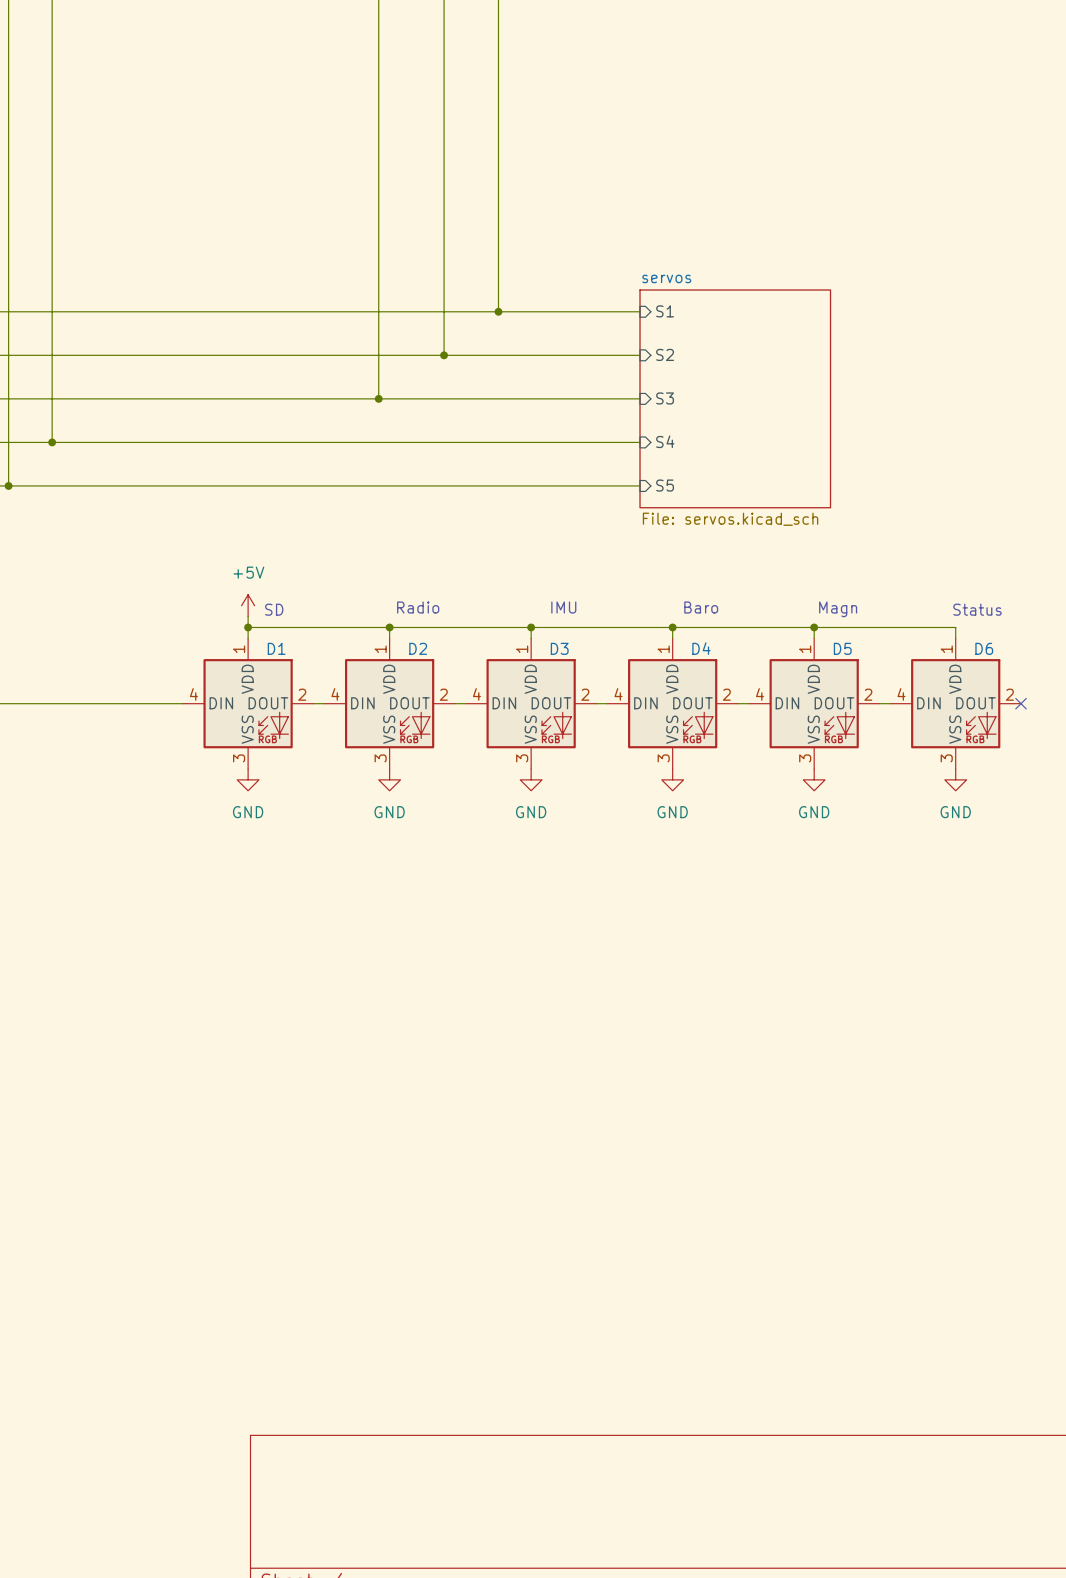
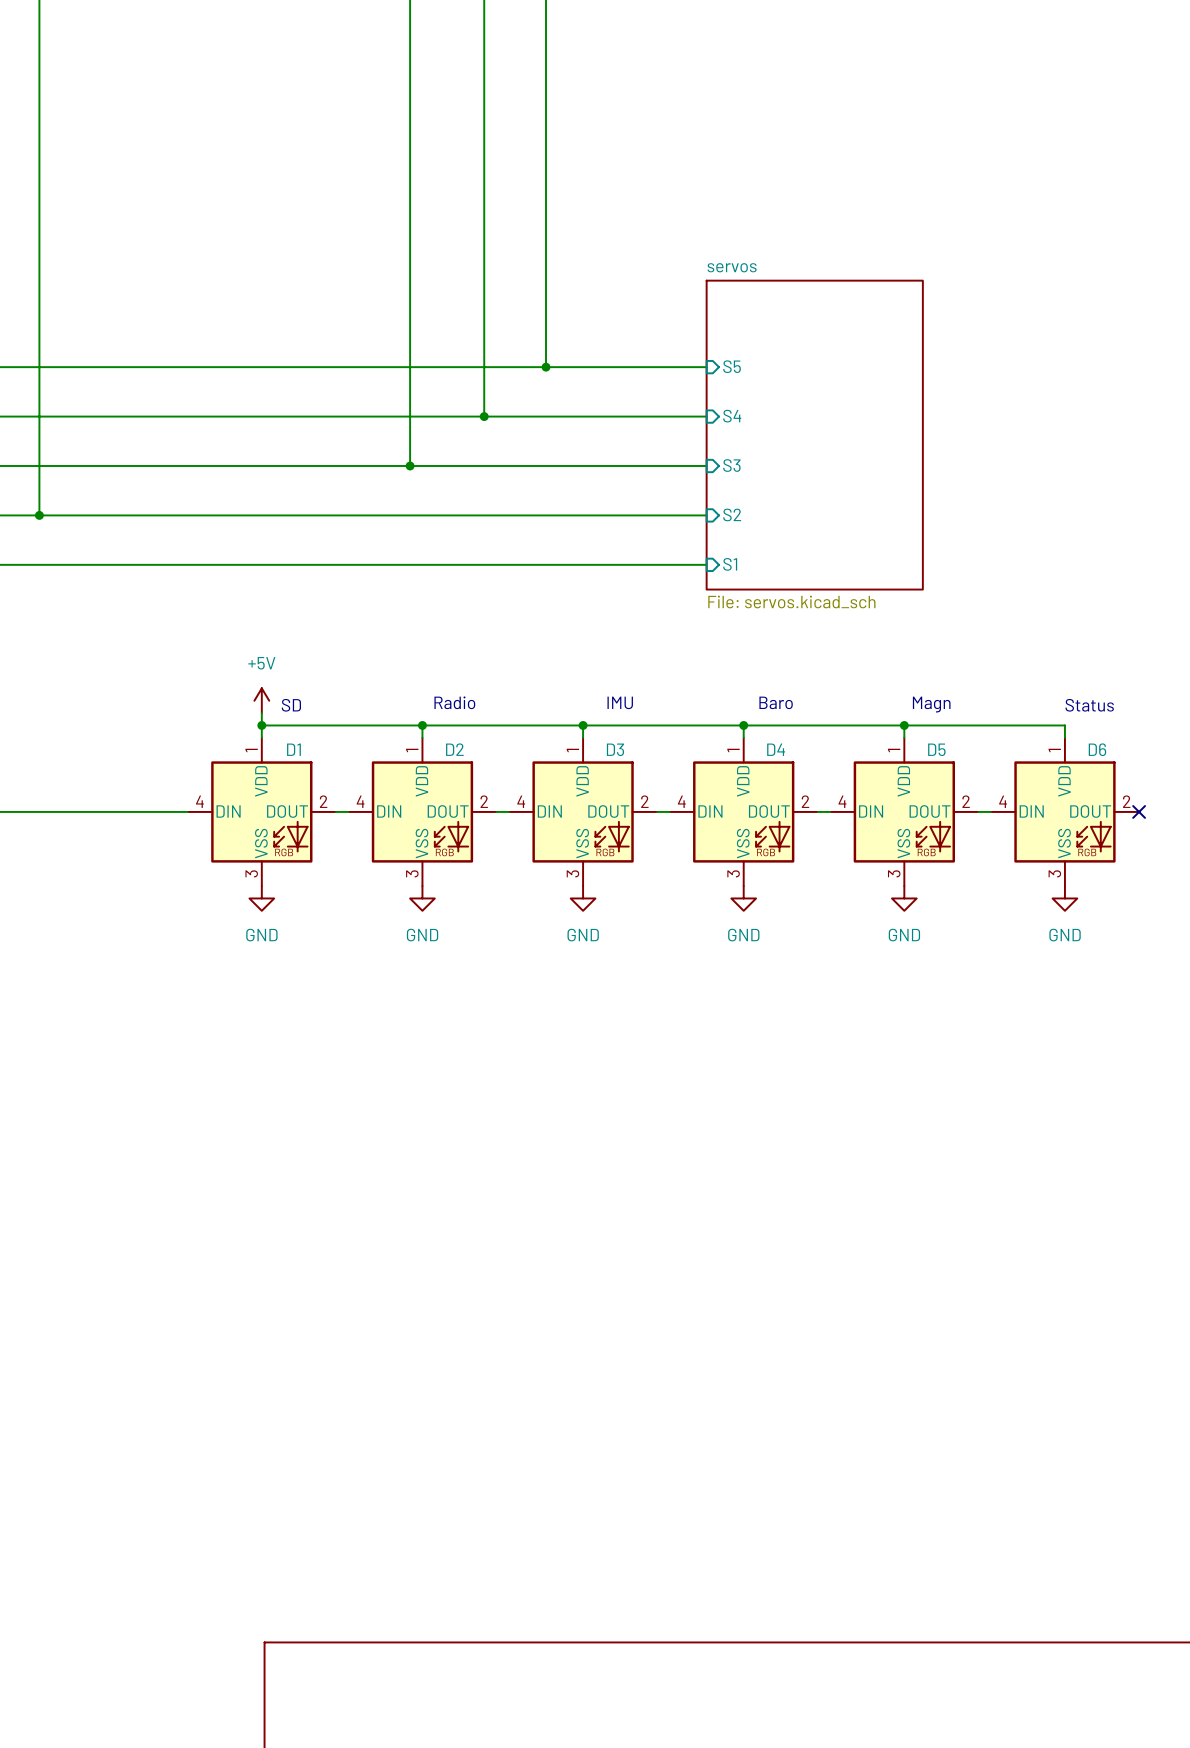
sheet pin: S1 (665, 311) -> S5 (732, 366)
sheet pin: S2 (665, 354) -> S4 (732, 416)
sheet servos: none -> File: servos.kicad_sch (814, 435)
sheet servos: File: servos.kicad_sch (735, 398) -> none
sheet pin: S4 (665, 441) -> S2 (732, 514)
sheet pin: S5 (665, 485) -> S1 (730, 564)

